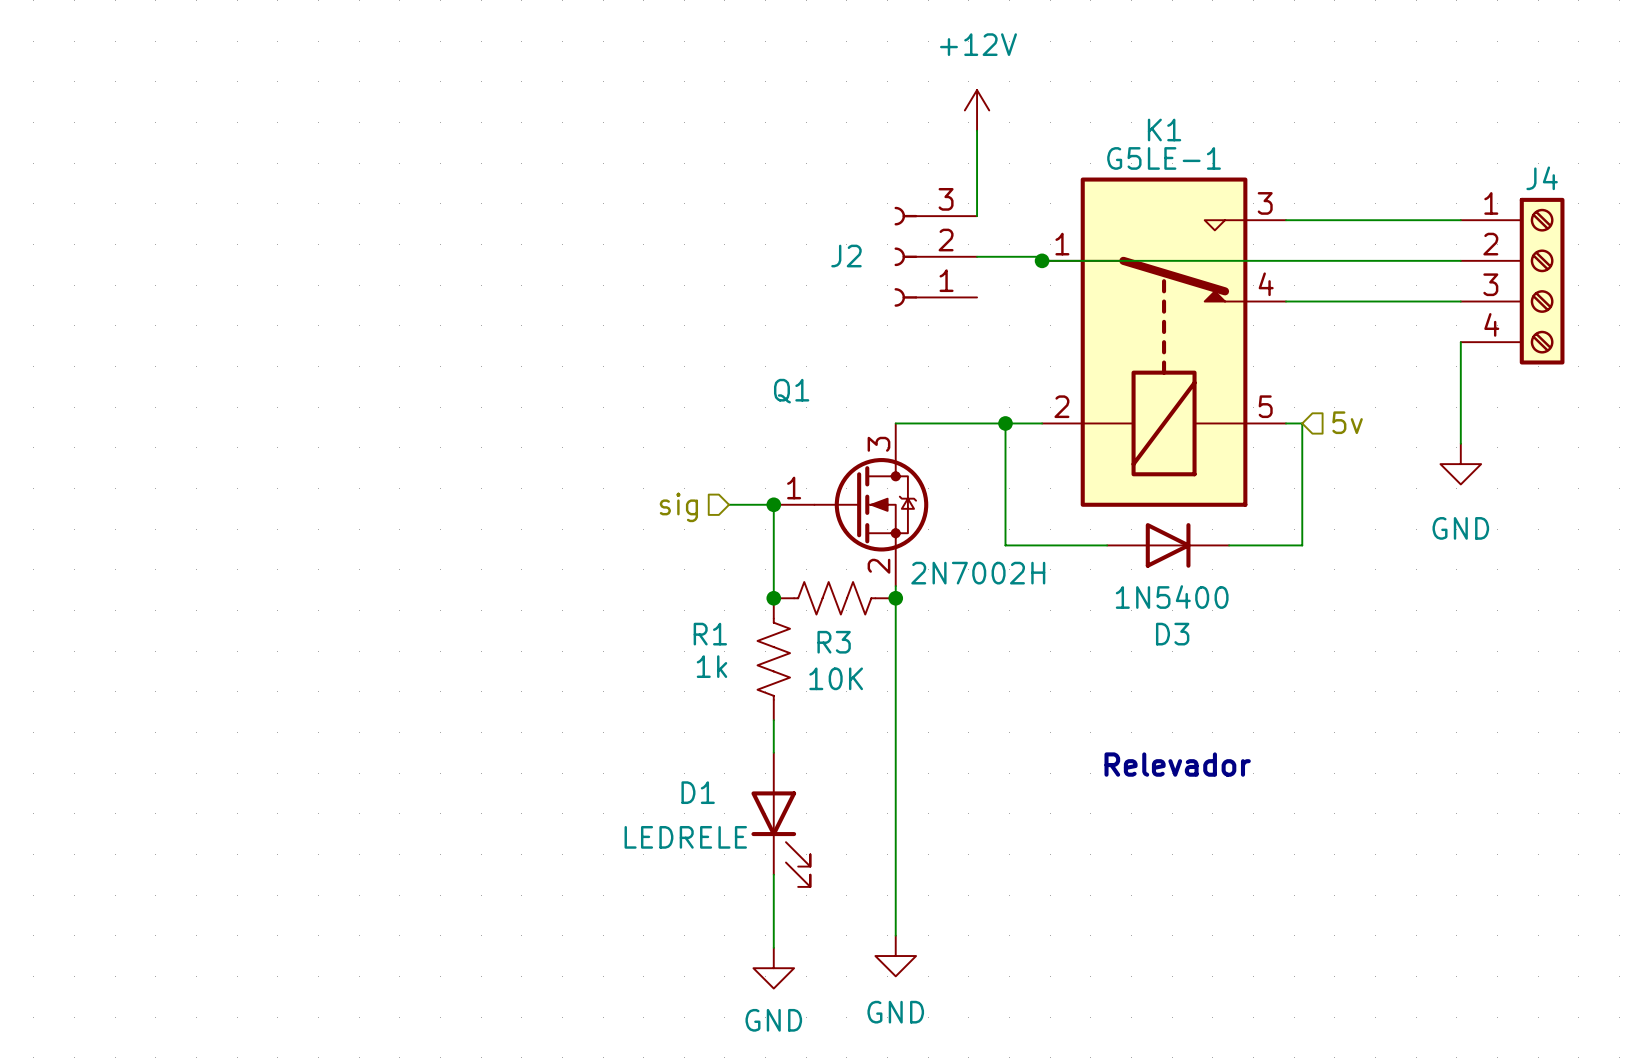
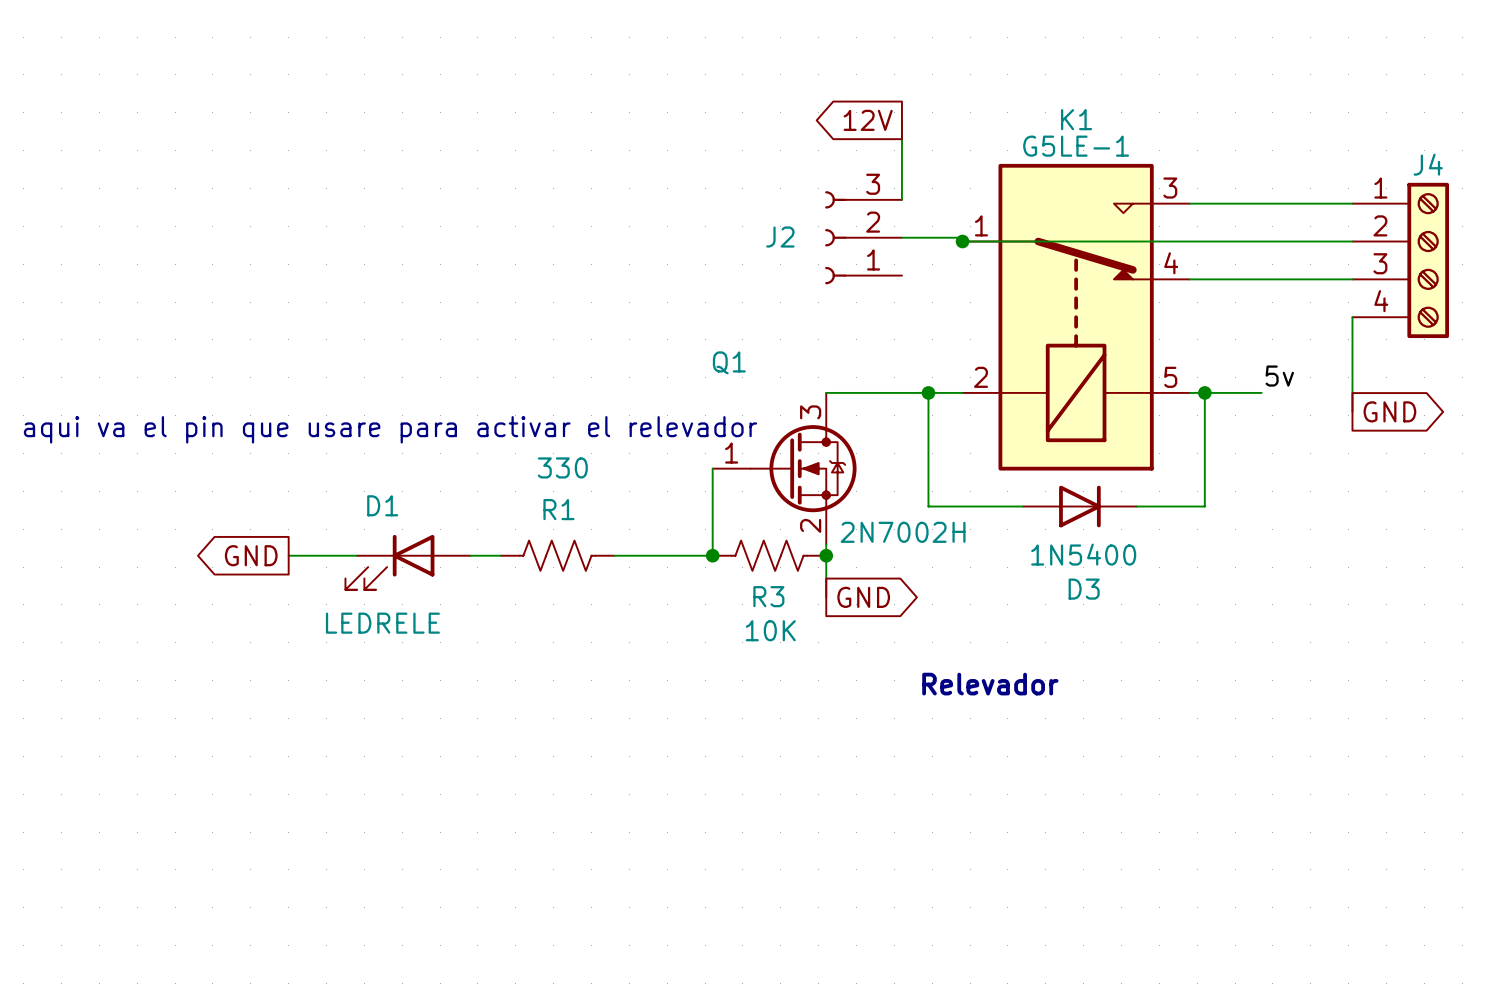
power symbol: +12V (977, 110) -> none
global label: none -> 12V (868, 120)
label: none -> 5v (1279, 376)
hierarchical label: 5v (1347, 422) -> none
wire: none -> (1204, 392) (1261, 392)
junction: none -> (1204, 392)
global label: none -> GND (1389, 411)
text: none -> aqui va el pin que usare para activar el relevador (390, 429)
power symbol: GND (1460, 464) -> none
wire: (729, 504) (773, 504) -> none
junction: (773, 504) -> none
hierarchical label: sig (678, 507) -> none
global label: none -> GND (251, 555)
wire: none -> (288, 555) (356, 555)
wire: none -> (470, 555) (500, 555)
wire: none -> (614, 555) (712, 555)
wire: (895, 642) (895, 935) -> none
global label: none -> GND (863, 597)
R1 rotation: 0° (773, 659) -> 90° clockwise (557, 555)
R1 position: (773, 659) -> (557, 555)
R1 value: 1k (711, 666) -> 330 (562, 467)
wire: (773, 720) (773, 752) -> none
text position: Relevador (1177, 764) -> Relevador (990, 684)
D1 name position: D1 (698, 792) -> D1 (382, 505)
D1 position: (780, 819) -> (407, 562)
D1 value position: LEDRELE (685, 837) -> LEDRELE (382, 623)
D1 rotation: 0° (780, 839) -> 90° clockwise (389, 562)
wire: (773, 874) (773, 947) -> none
power symbol: GND (895, 956) -> none
power symbol: GND (773, 968) -> none

